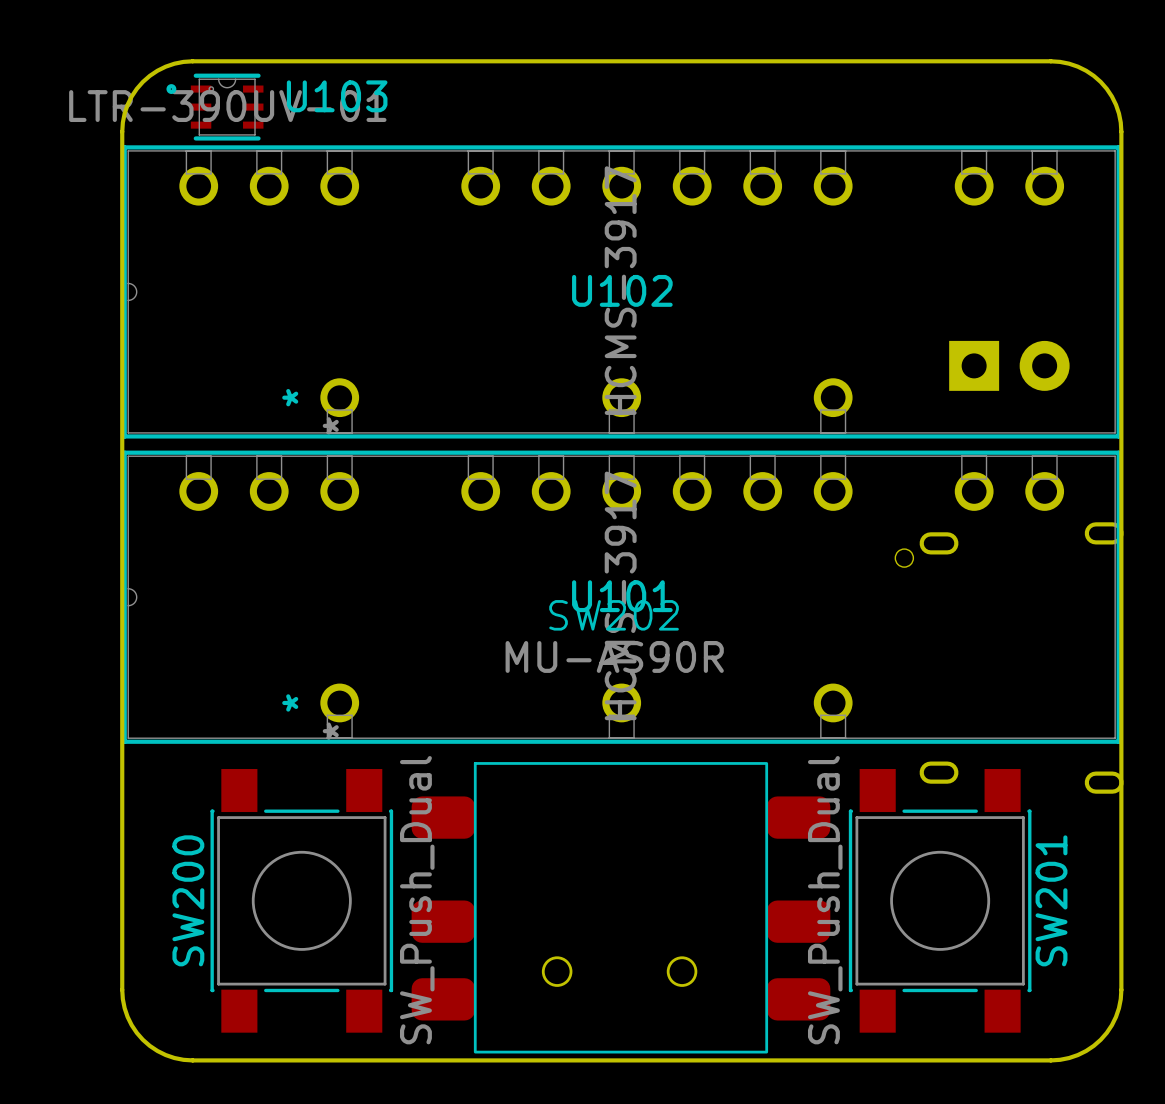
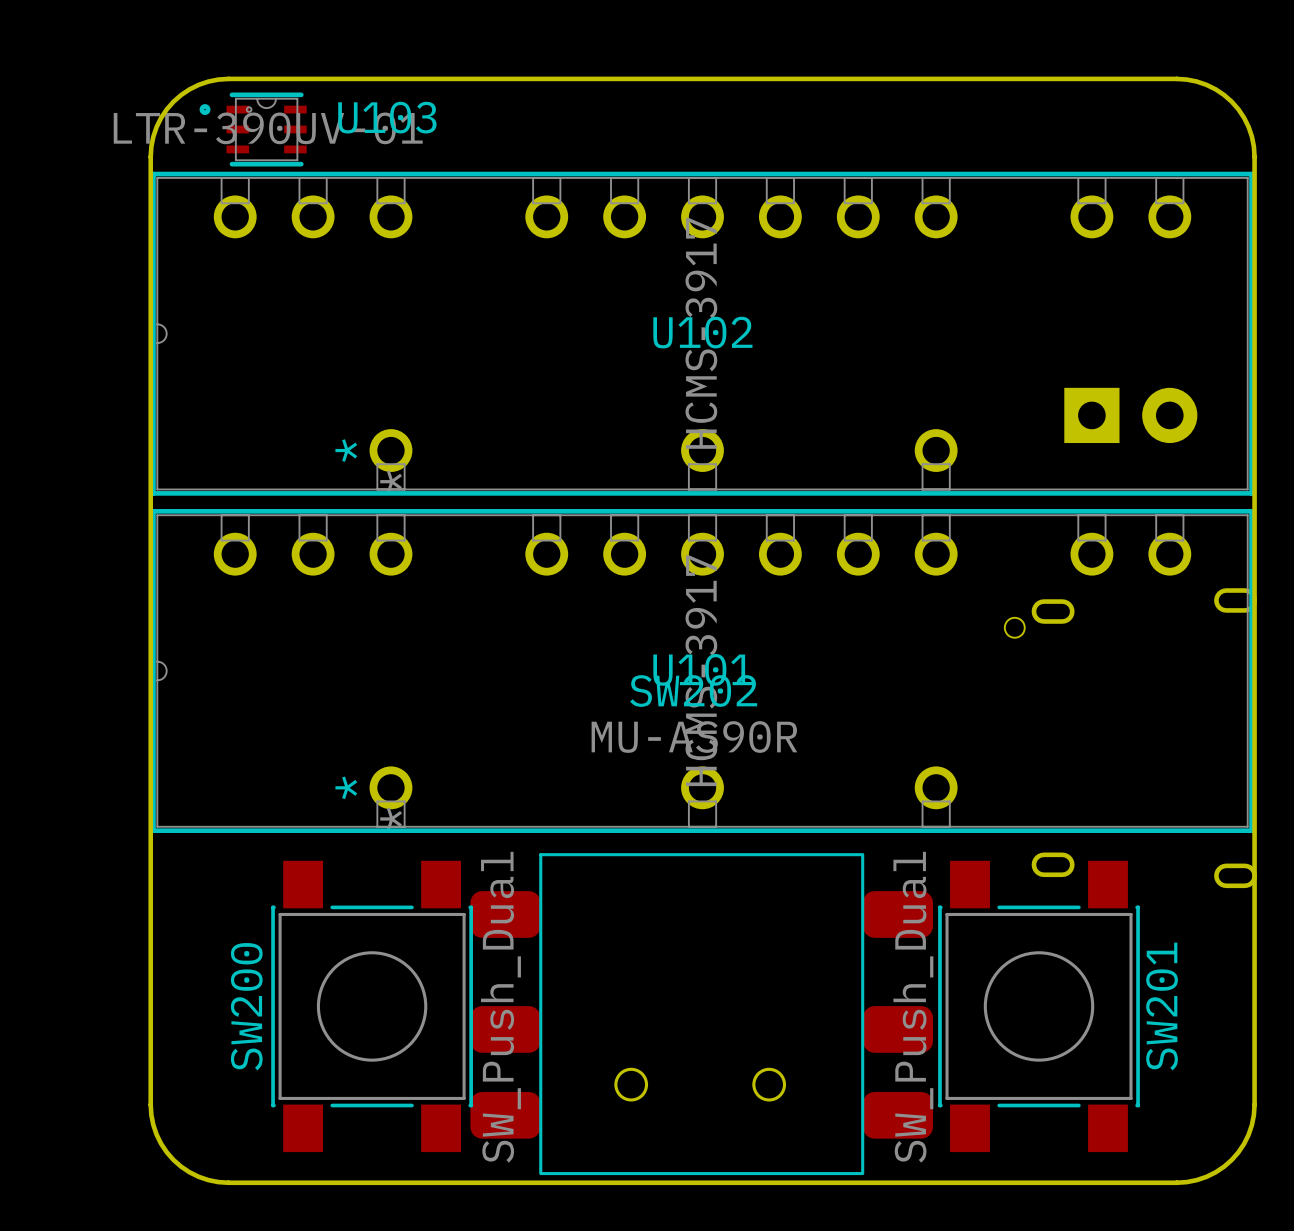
SW200 position: (301, 900) -> (372, 1006)
SW201 position: (940, 900) -> (1039, 1006)

